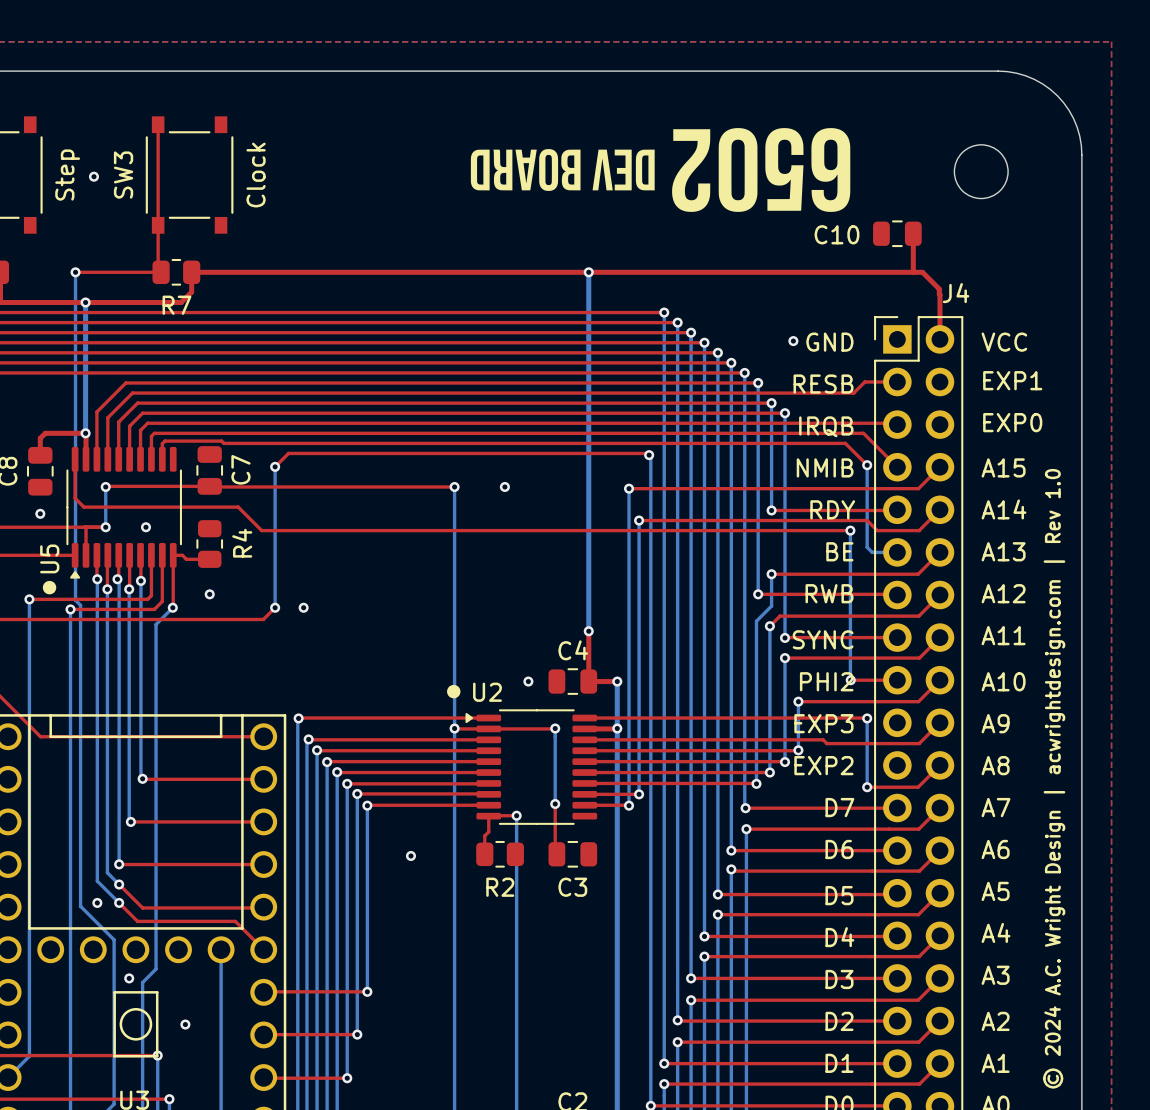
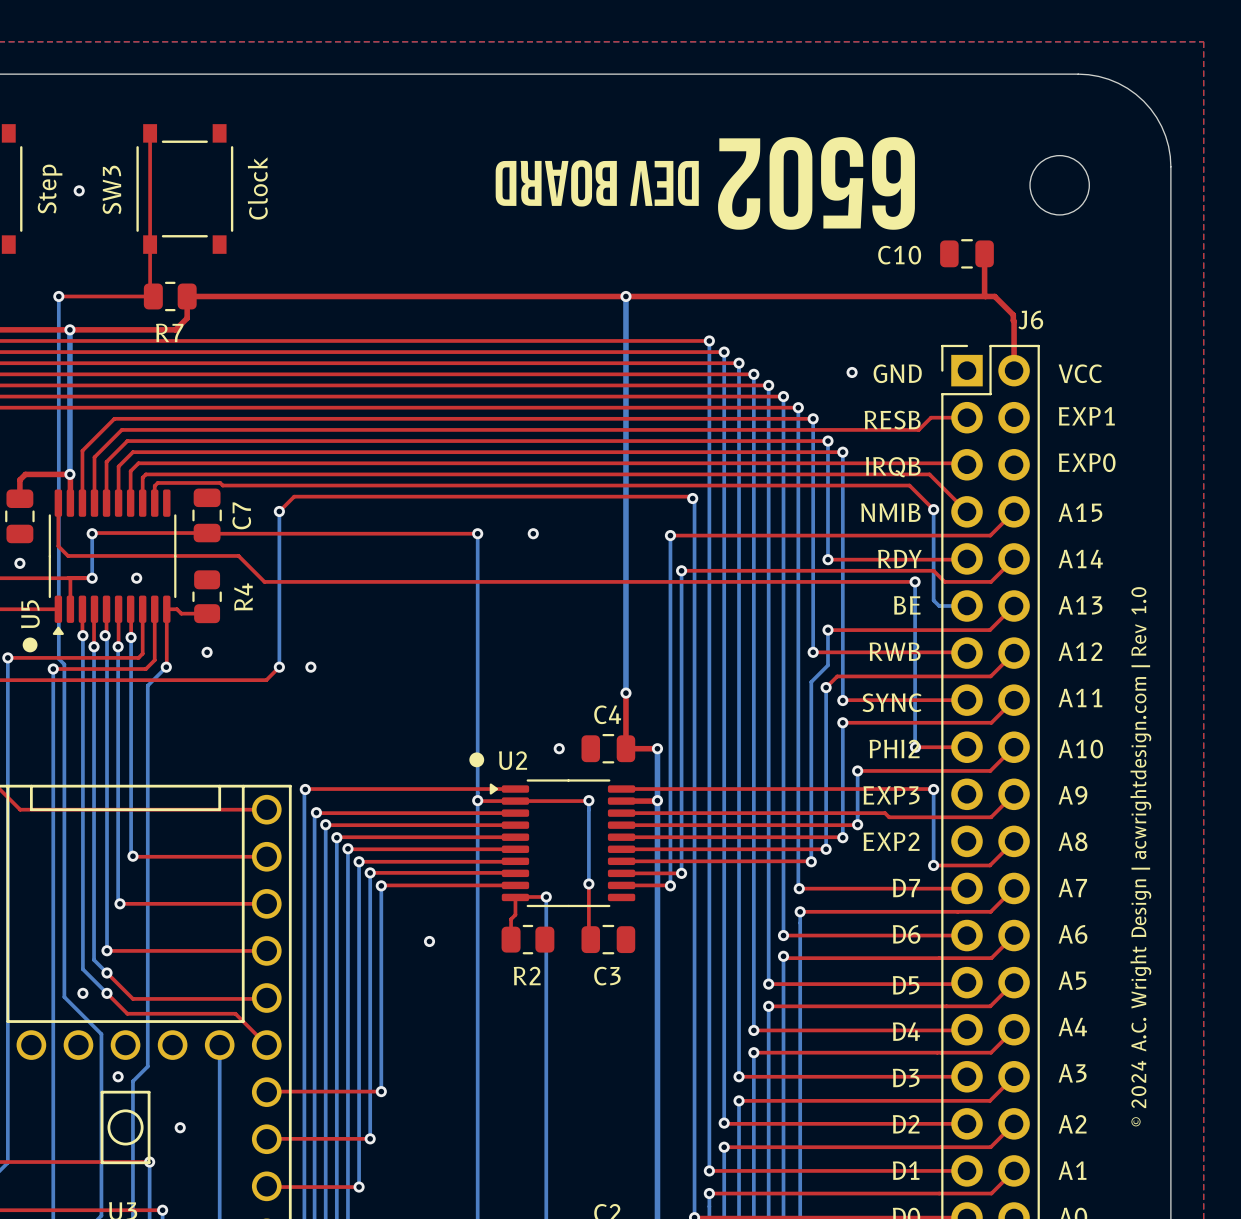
J4 name: J4 (956, 293) -> J6 (1030, 319)

